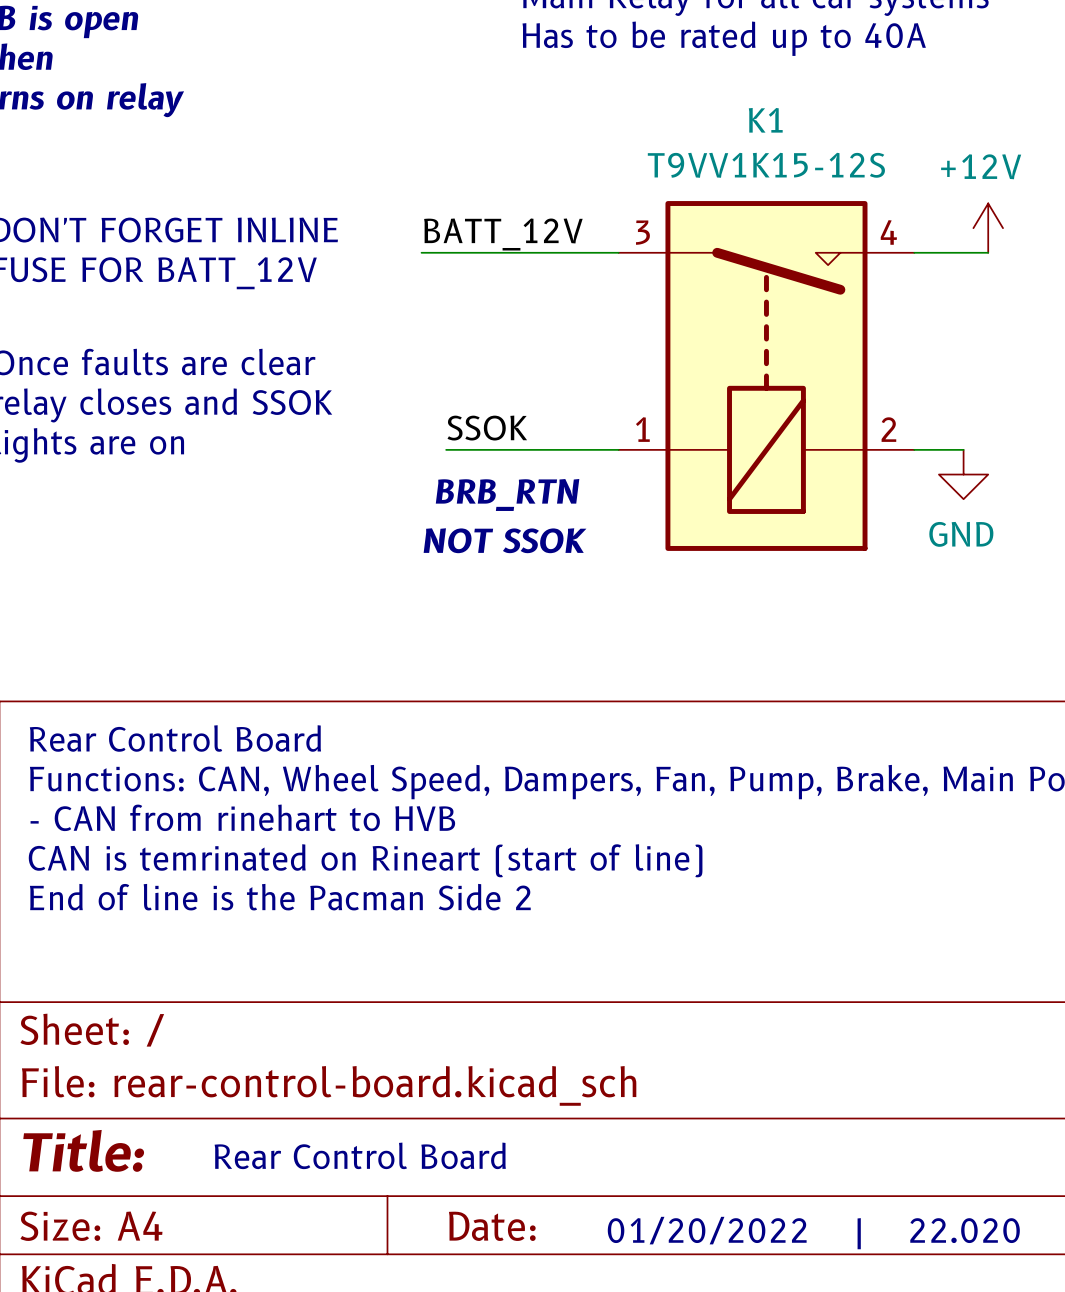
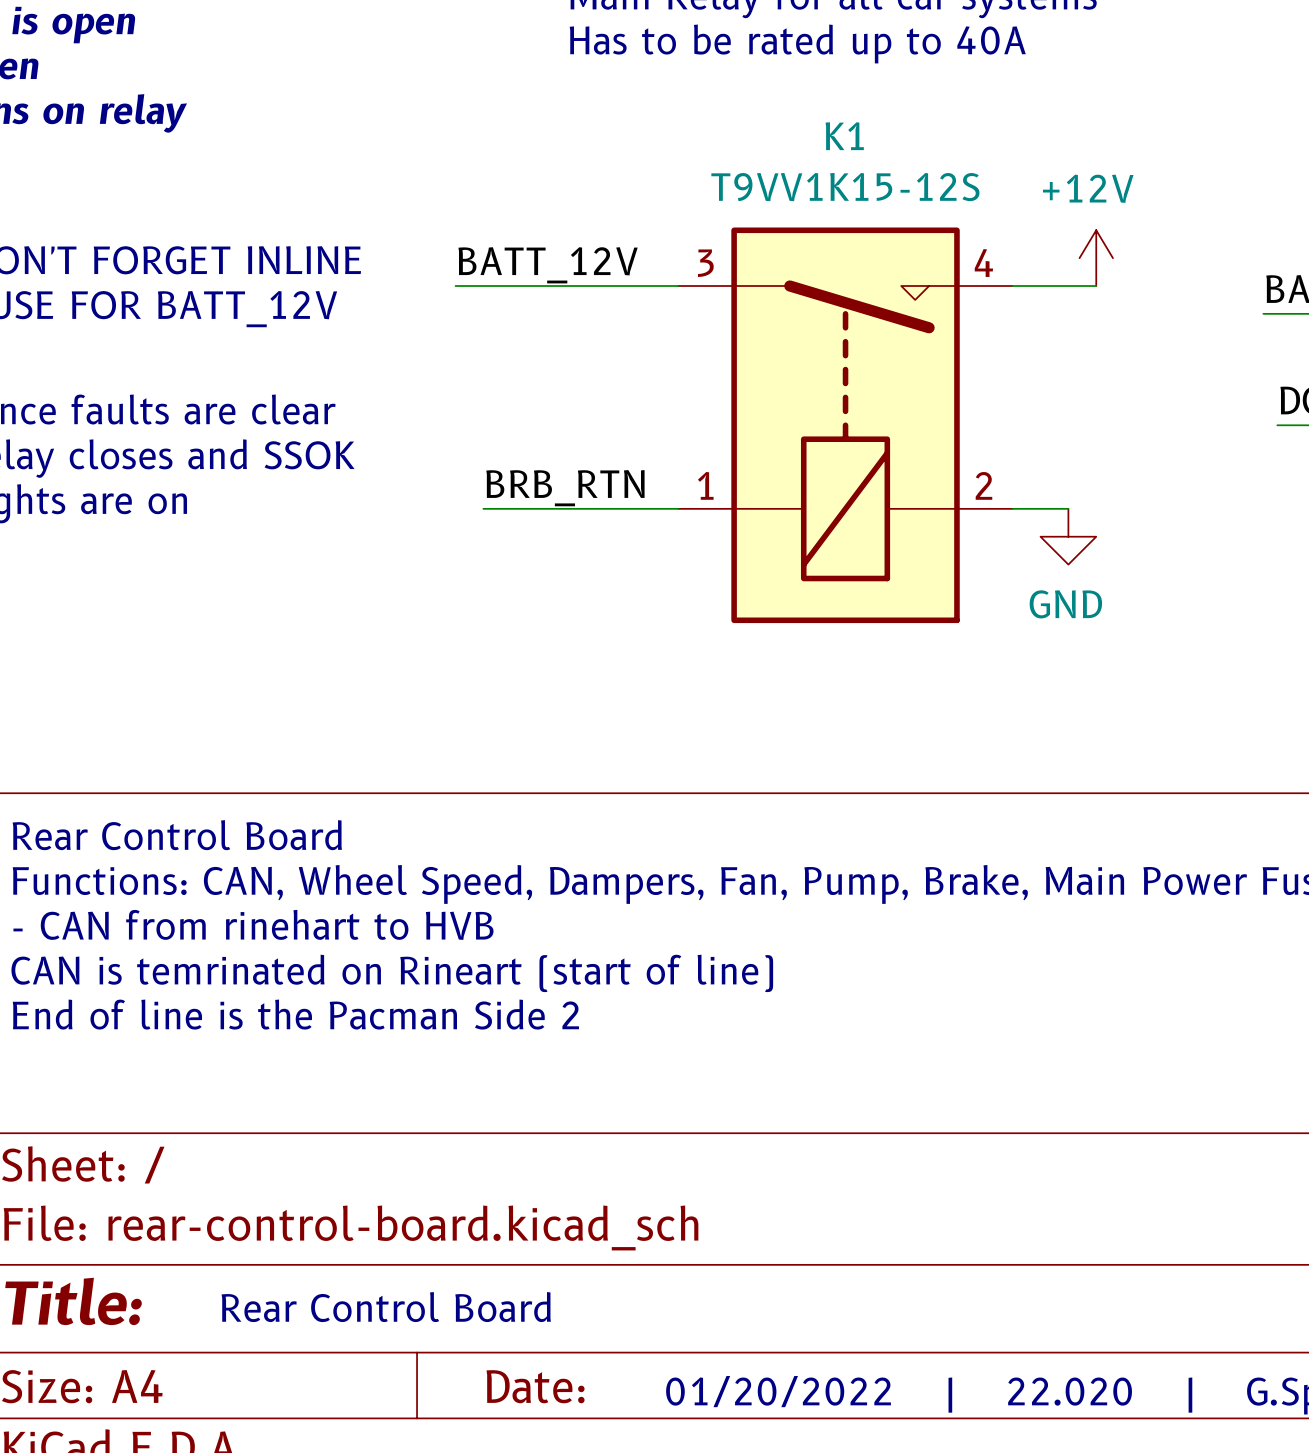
label: SSOK (487, 428) -> BRB_RTN (565, 488)
text: BRB_RTN (507, 494) -> none
text: NOT SSOK (505, 540) -> none

